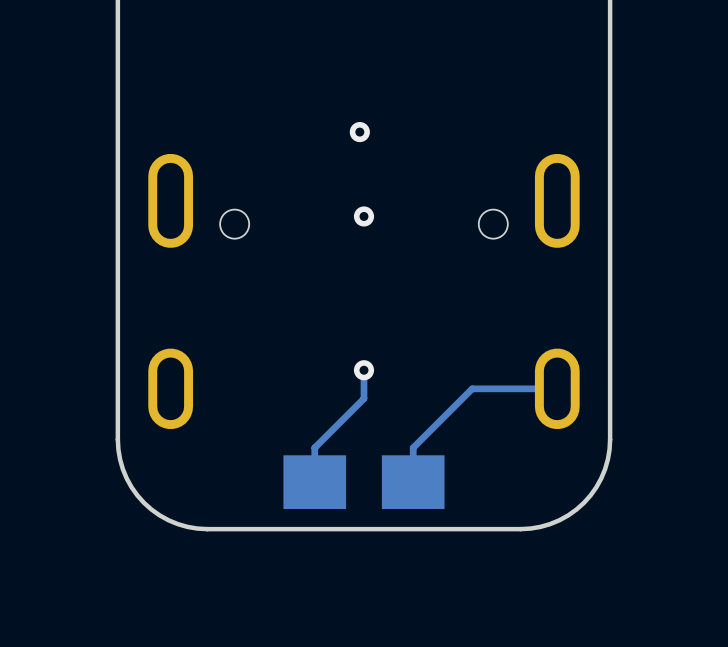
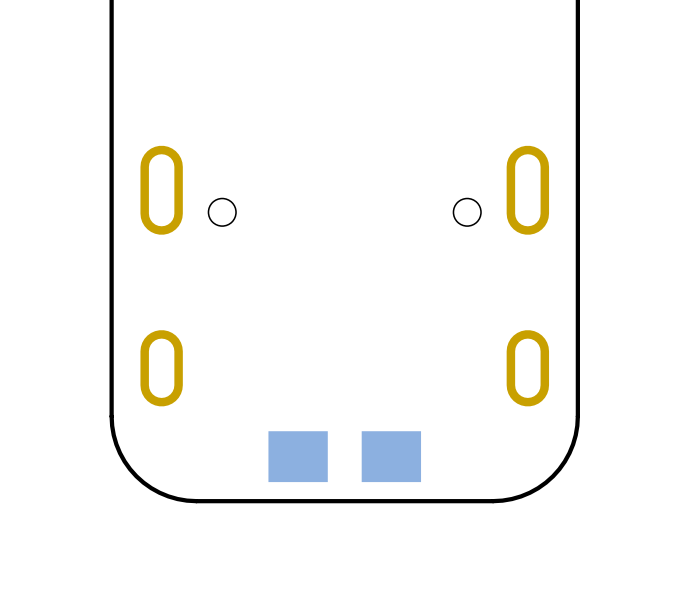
via: (359, 132) -> none
via: (363, 216) -> none
track: (363, 370) (363, 398) (314, 447) (314, 482) -> none
via: (363, 370) -> none
track: (557, 388) (472, 388) (413, 447) (413, 482) -> none

